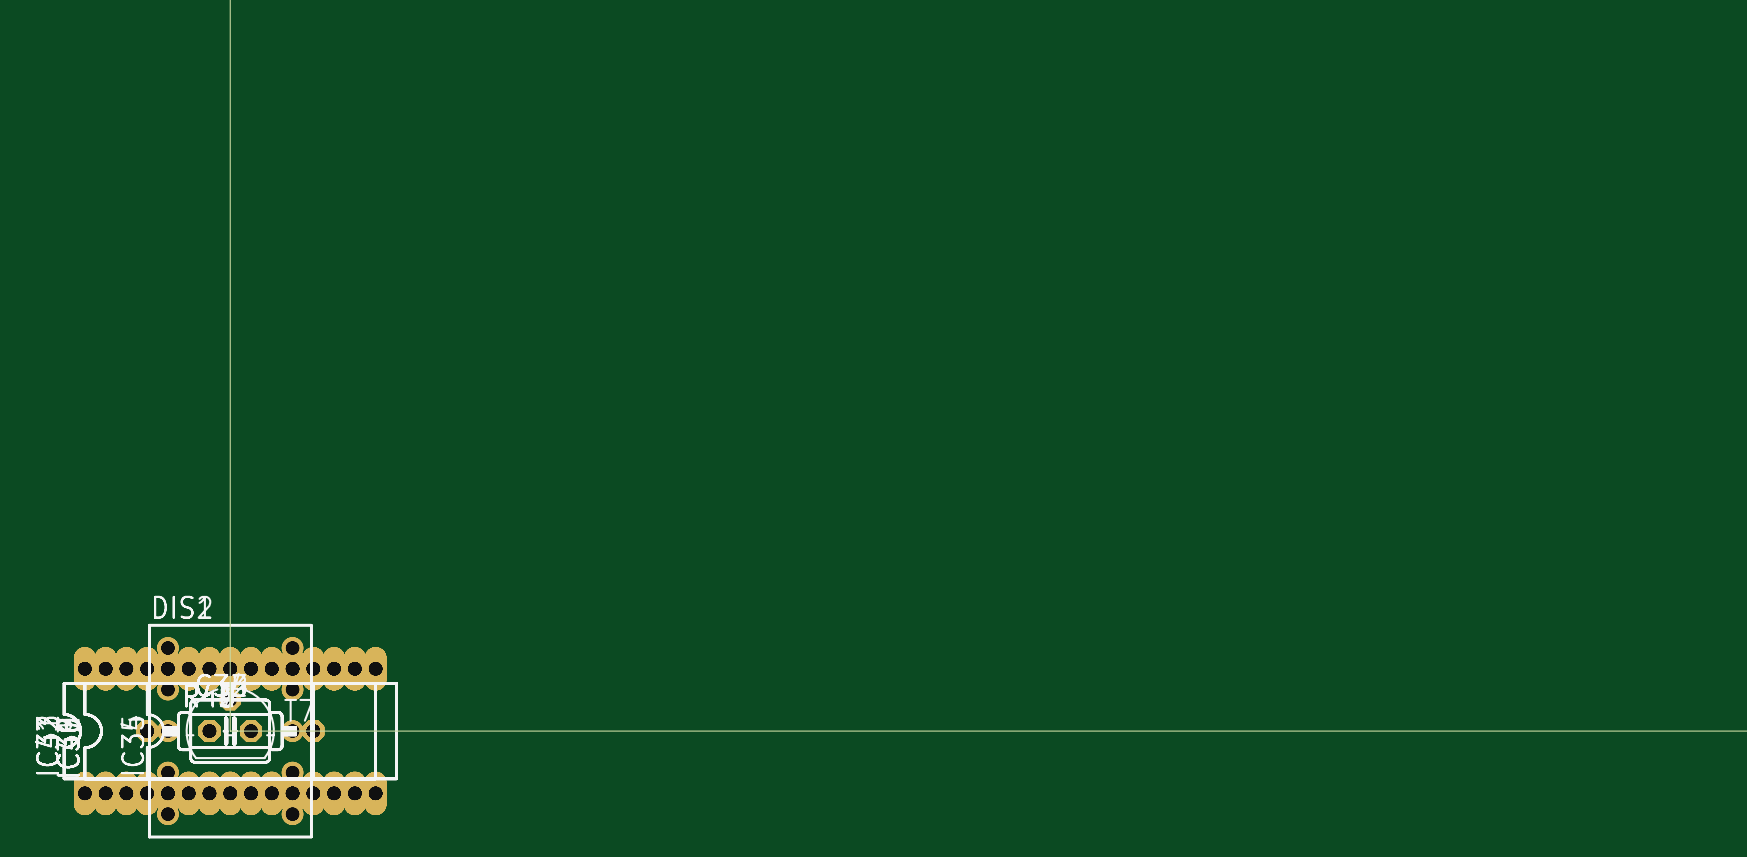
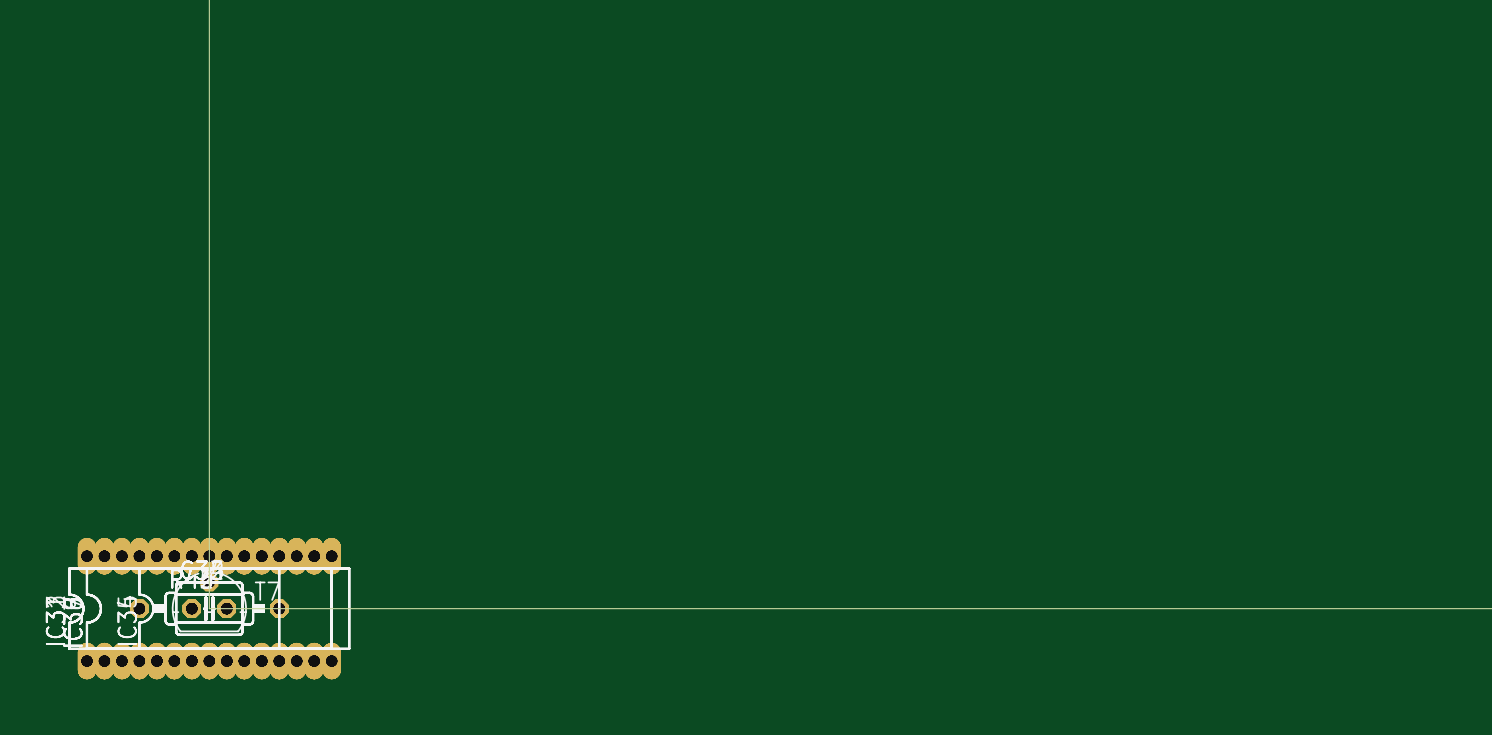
part: (230, 731) -> none
part: (230, 731) -> none
part: (230, 731) -> none
part: (230, 731) -> none
part: (230, 731) -> none
part: (230, 731) -> none
part: (230, 731) -> none
part: (230, 731) -> none
part: (230, 731) -> none
part: (230, 731) -> none

